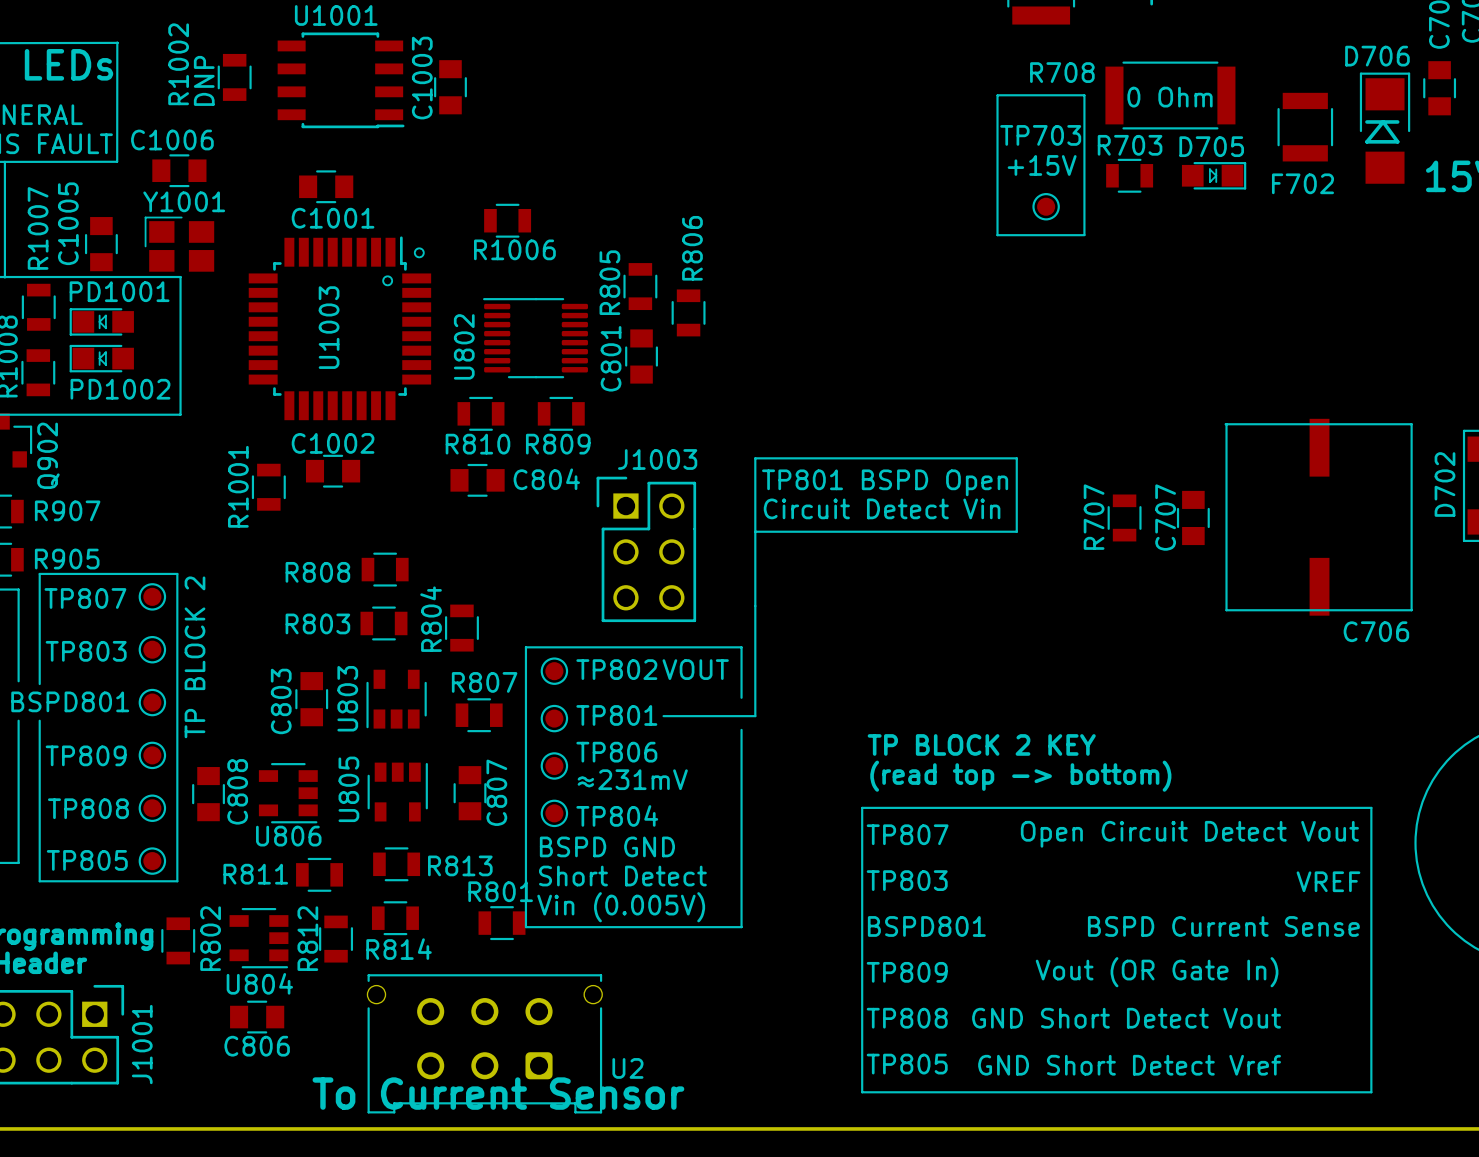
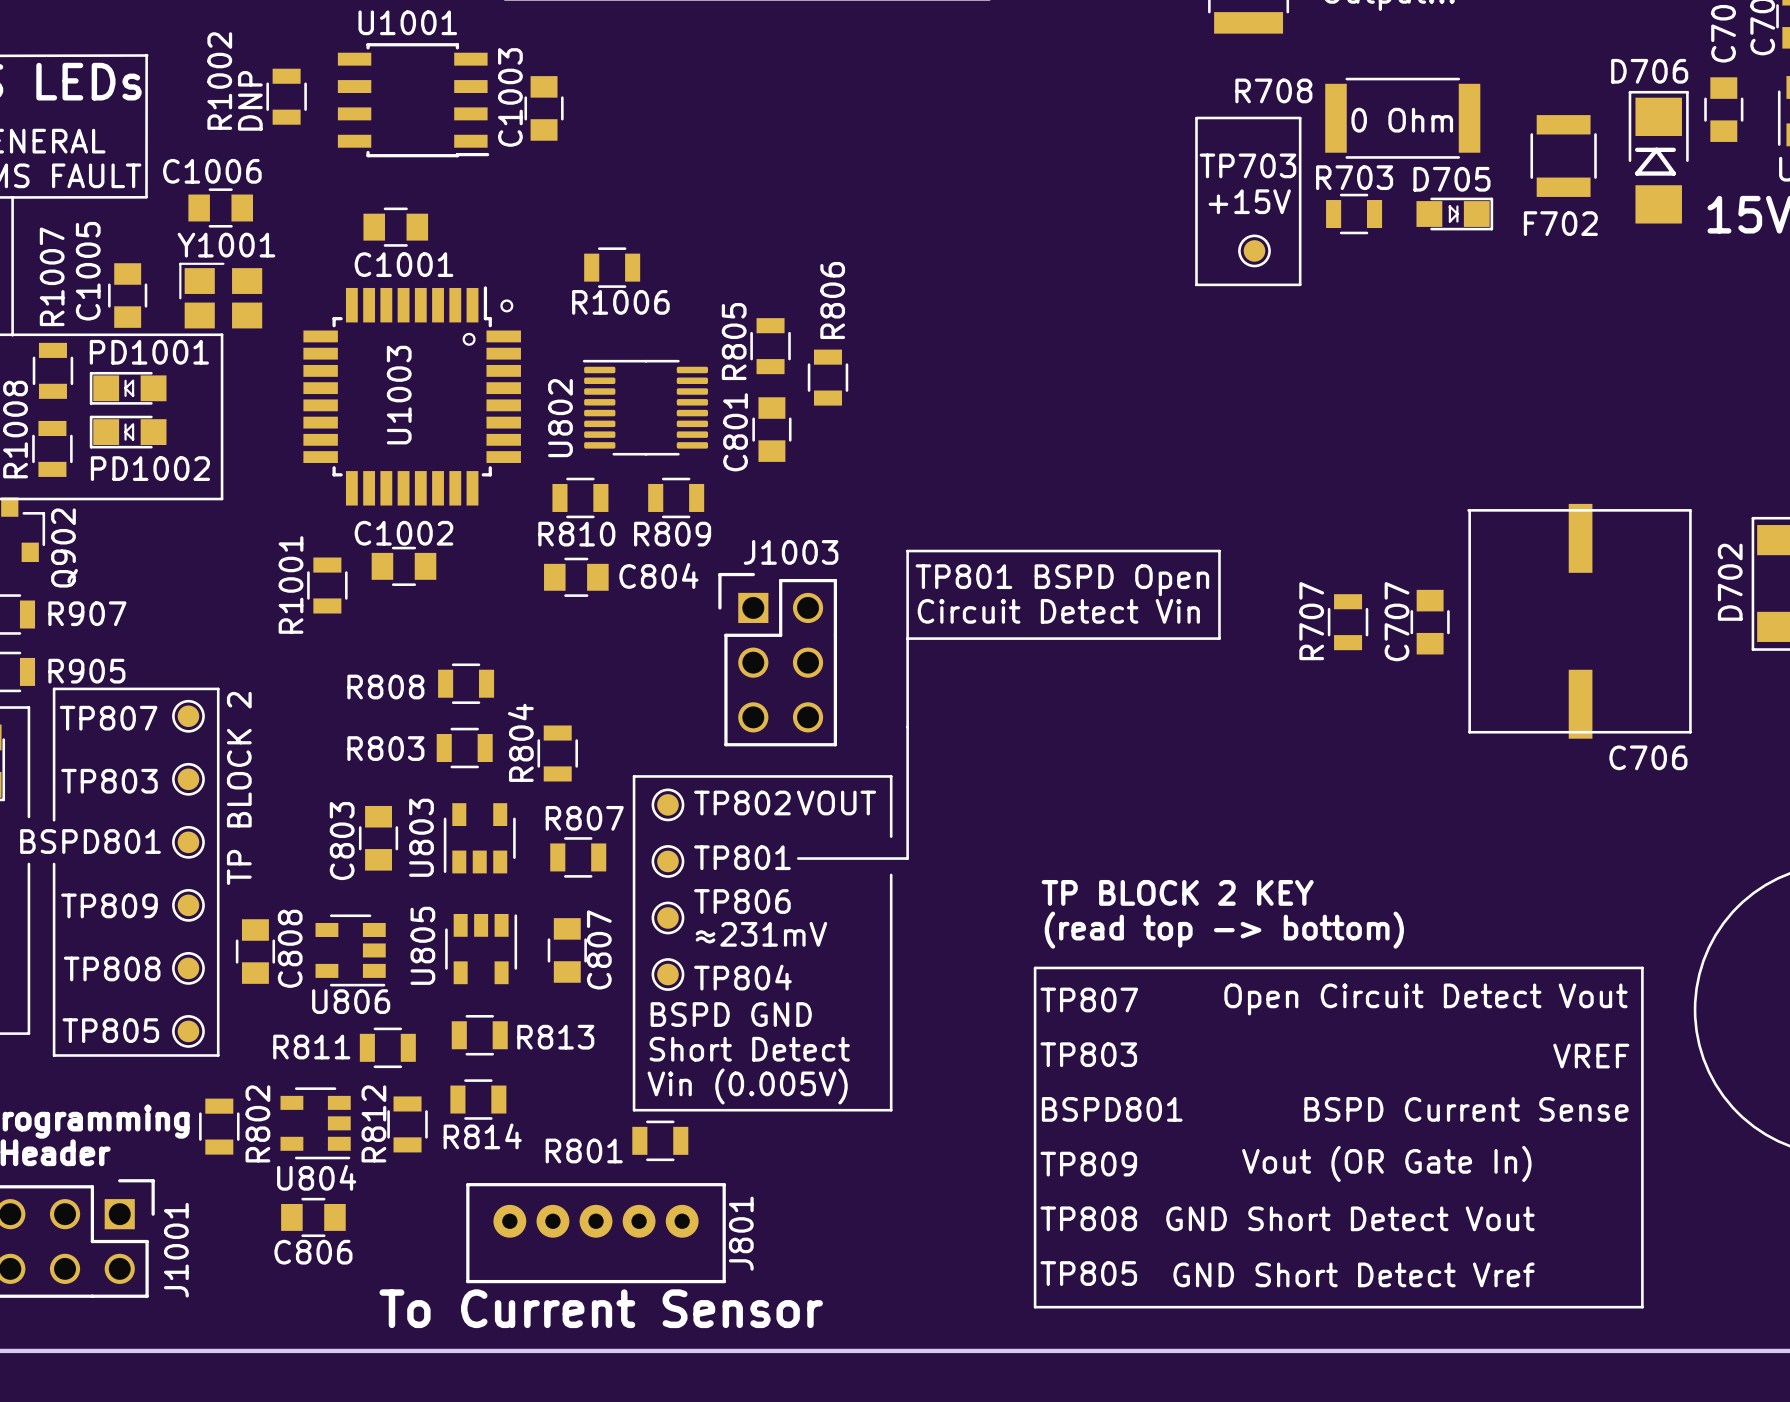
R801 name position: R801 (500, 891) -> R801 (584, 1150)
R801 position: (502, 923) -> (660, 1140)
J801: none -> (596, 1233)
U2: (484, 1043) -> none

